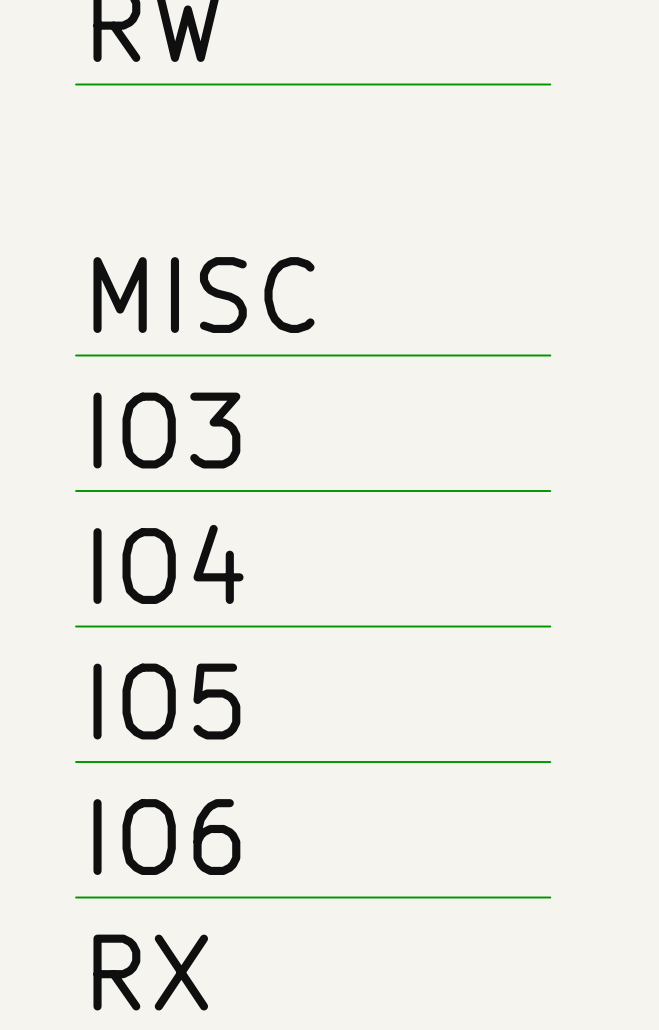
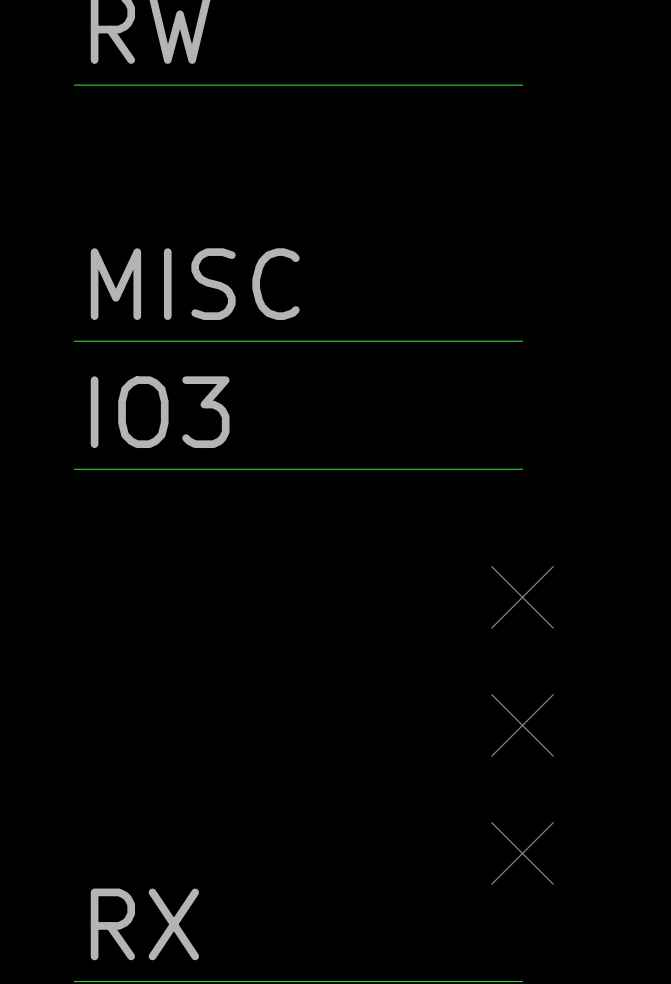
label: IO4 (168, 564) -> none
wire: (76, 626) (550, 626) -> none
no-connect mark: none -> (522, 597)
label: IO5 (166, 701) -> none
wire: (76, 762) (550, 762) -> none
no-connect mark: none -> (522, 725)
label: IO6 (166, 837) -> none
wire: (76, 897) (550, 897) -> none
no-connect mark: none -> (522, 853)

